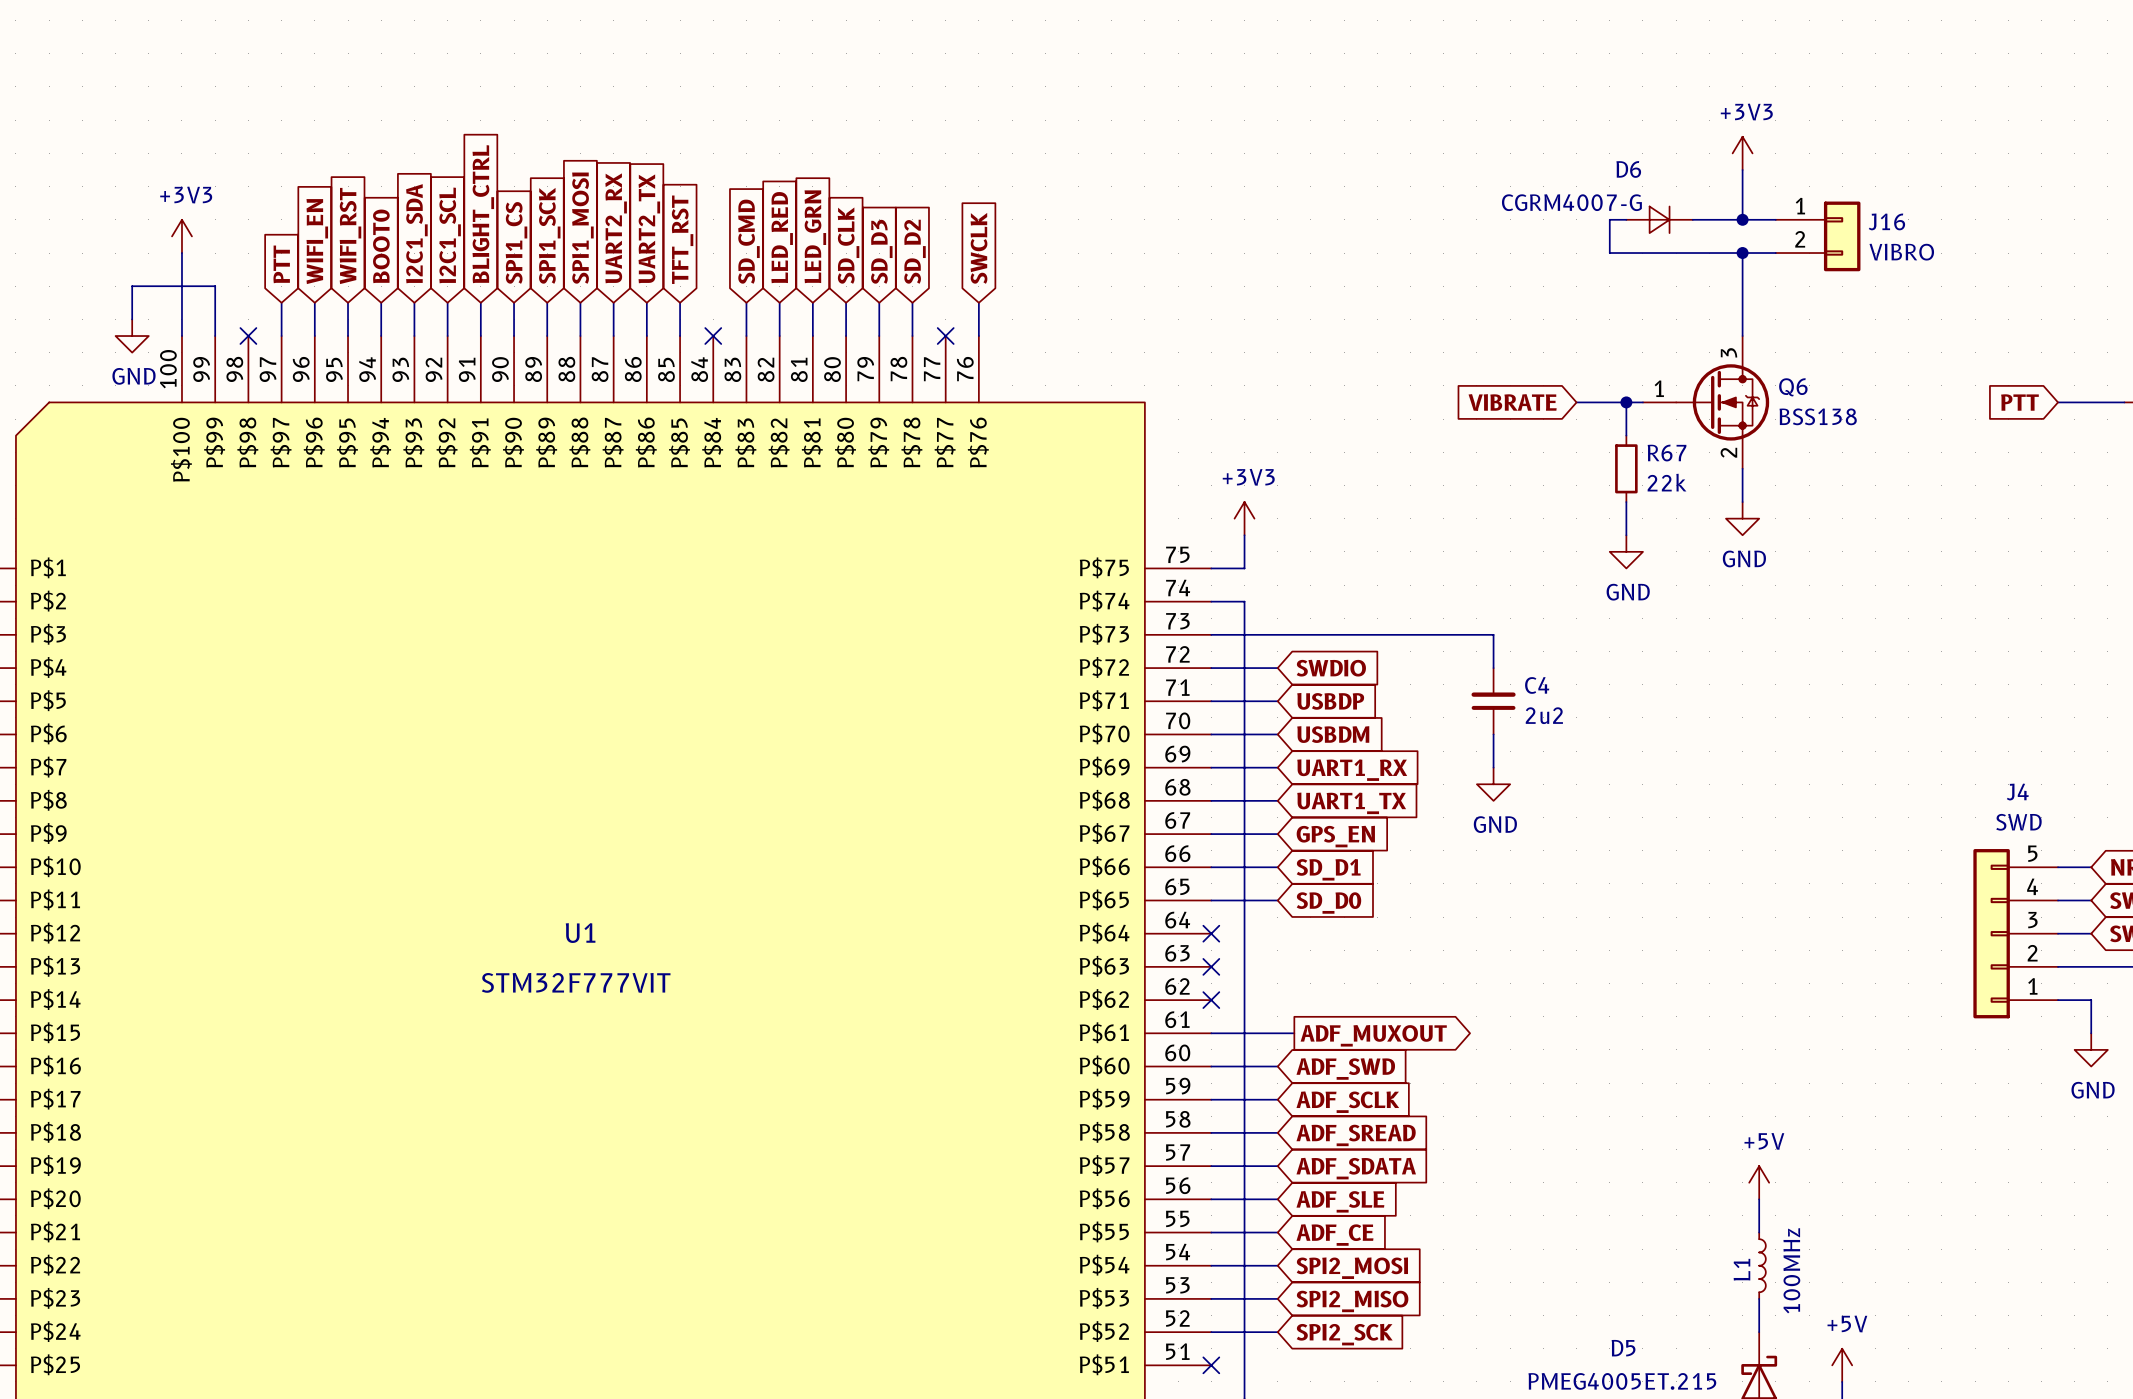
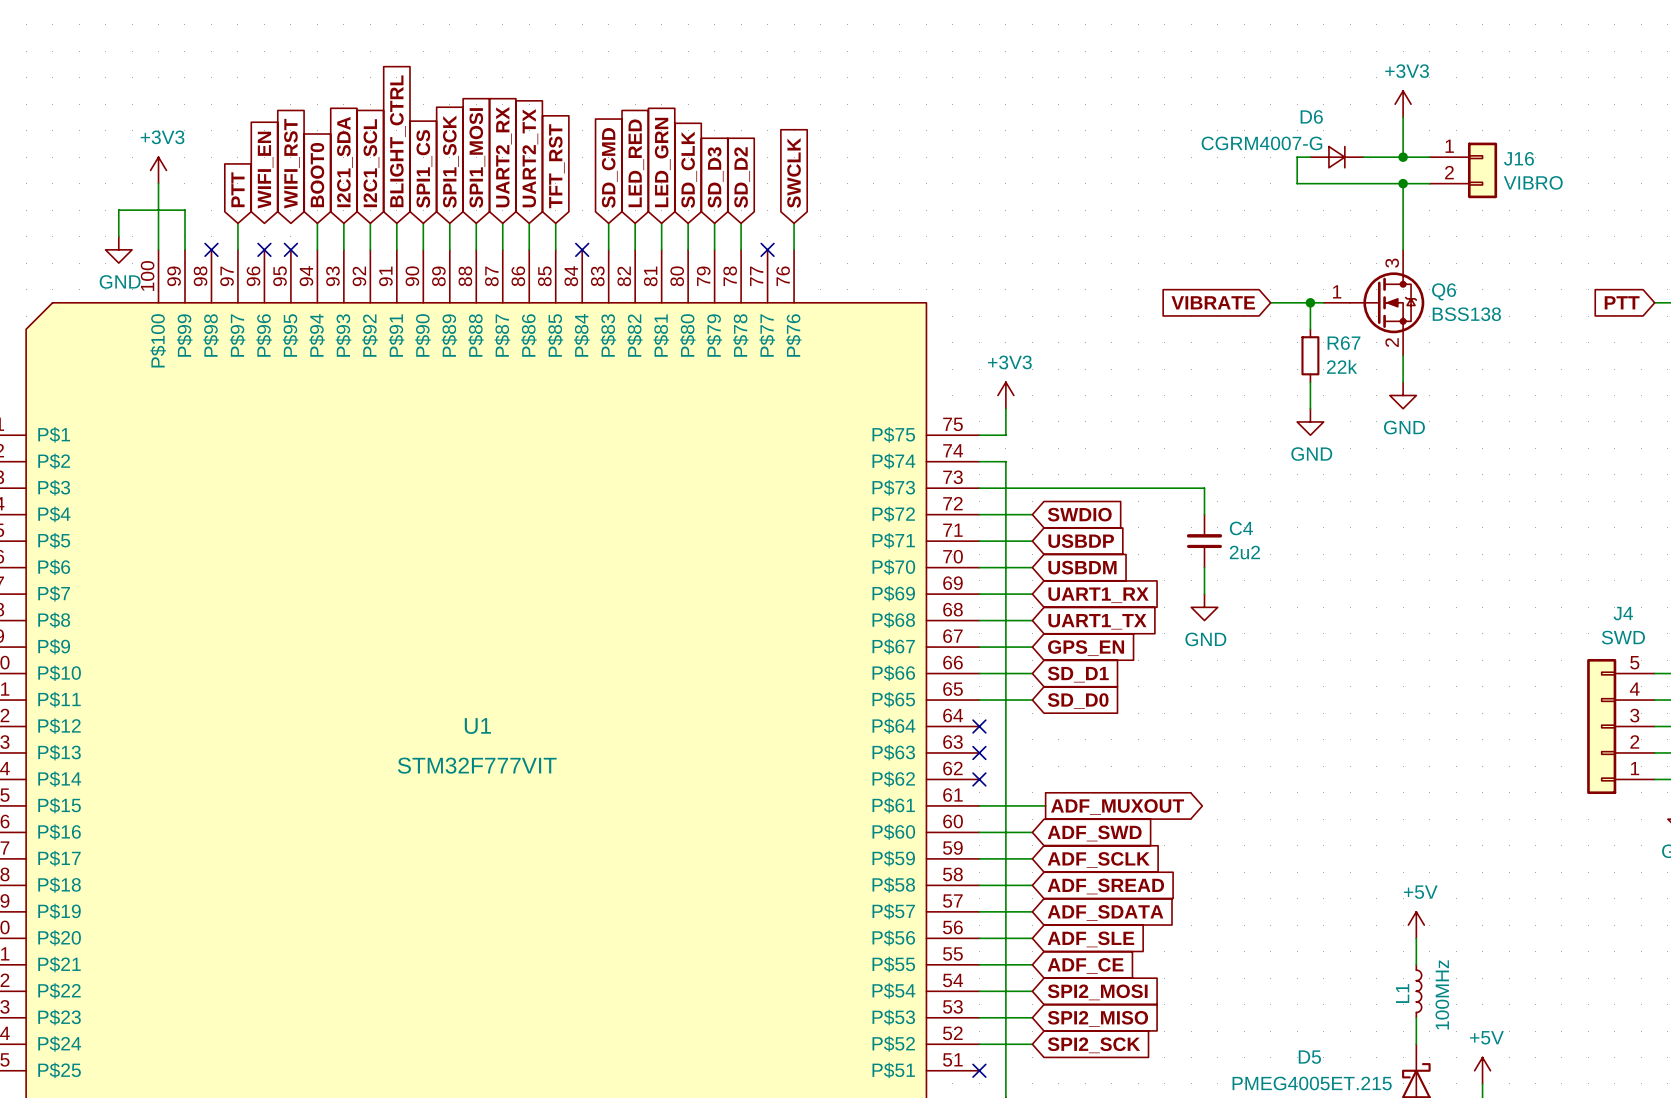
wire: (314, 302) (314, 336) -> none
wire: (348, 302) (348, 336) -> none
no-connect mark: none -> (264, 249)
no-connect mark: none -> (290, 249)

